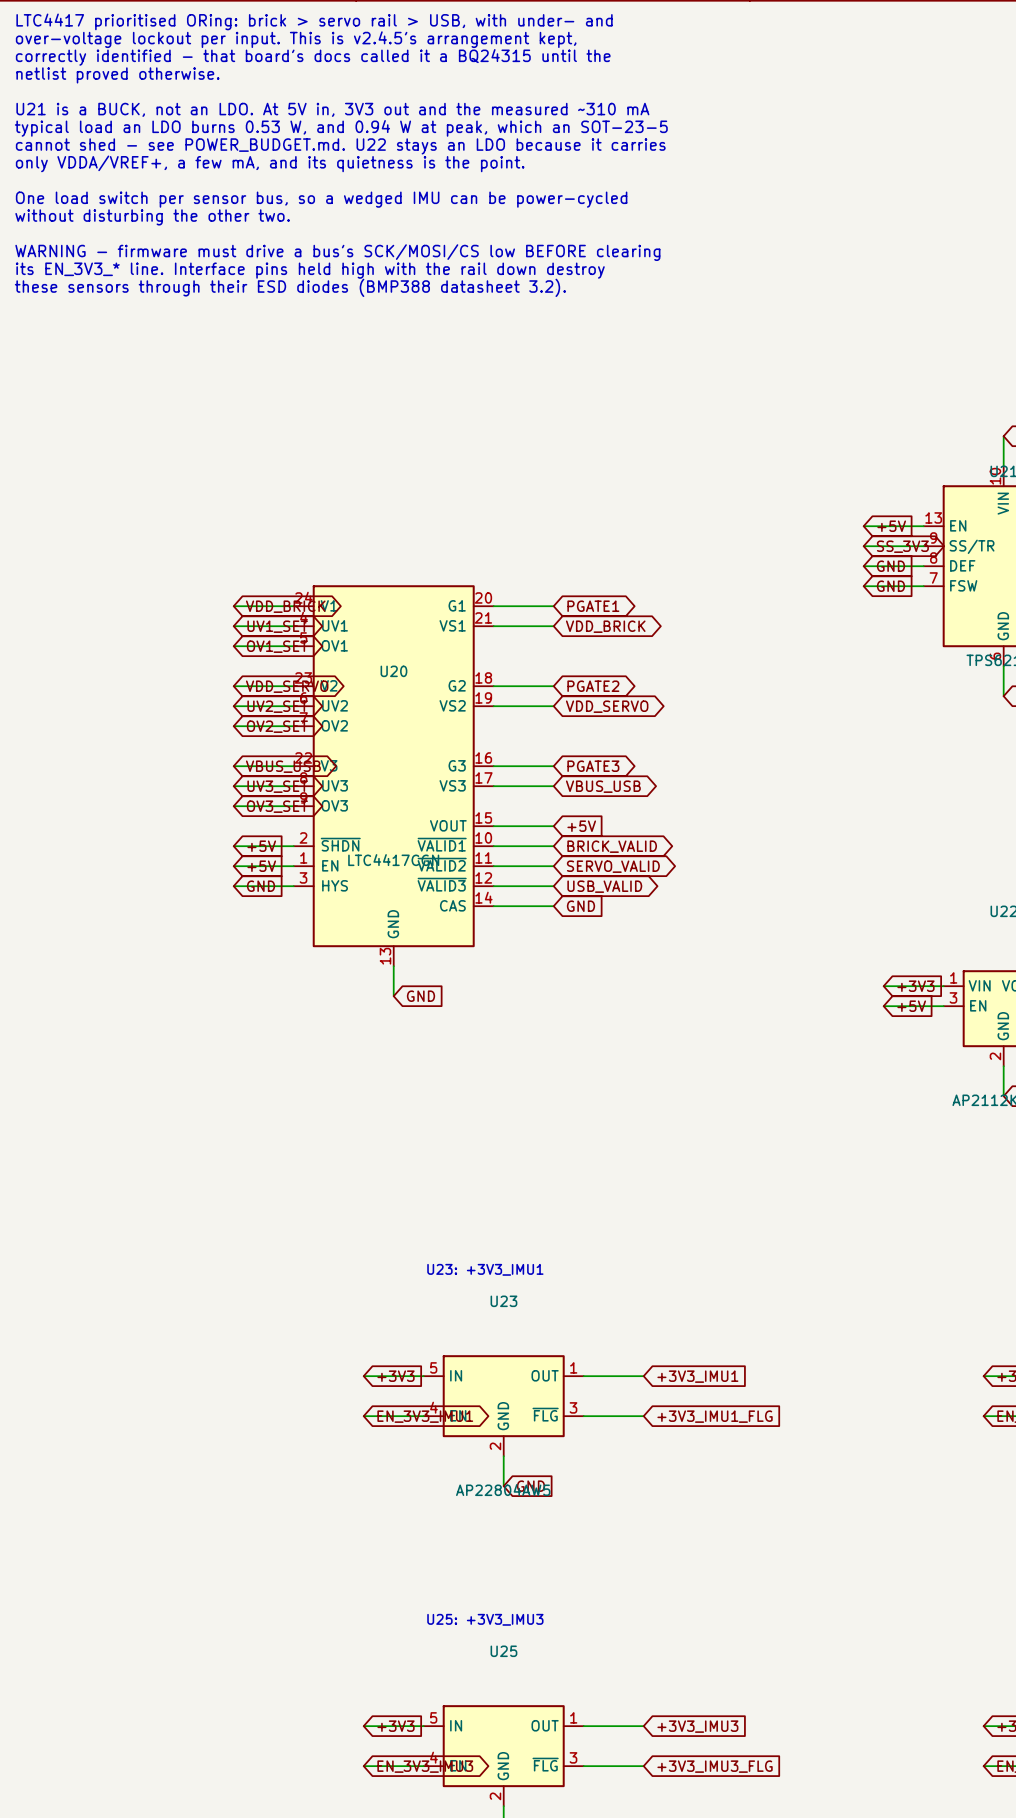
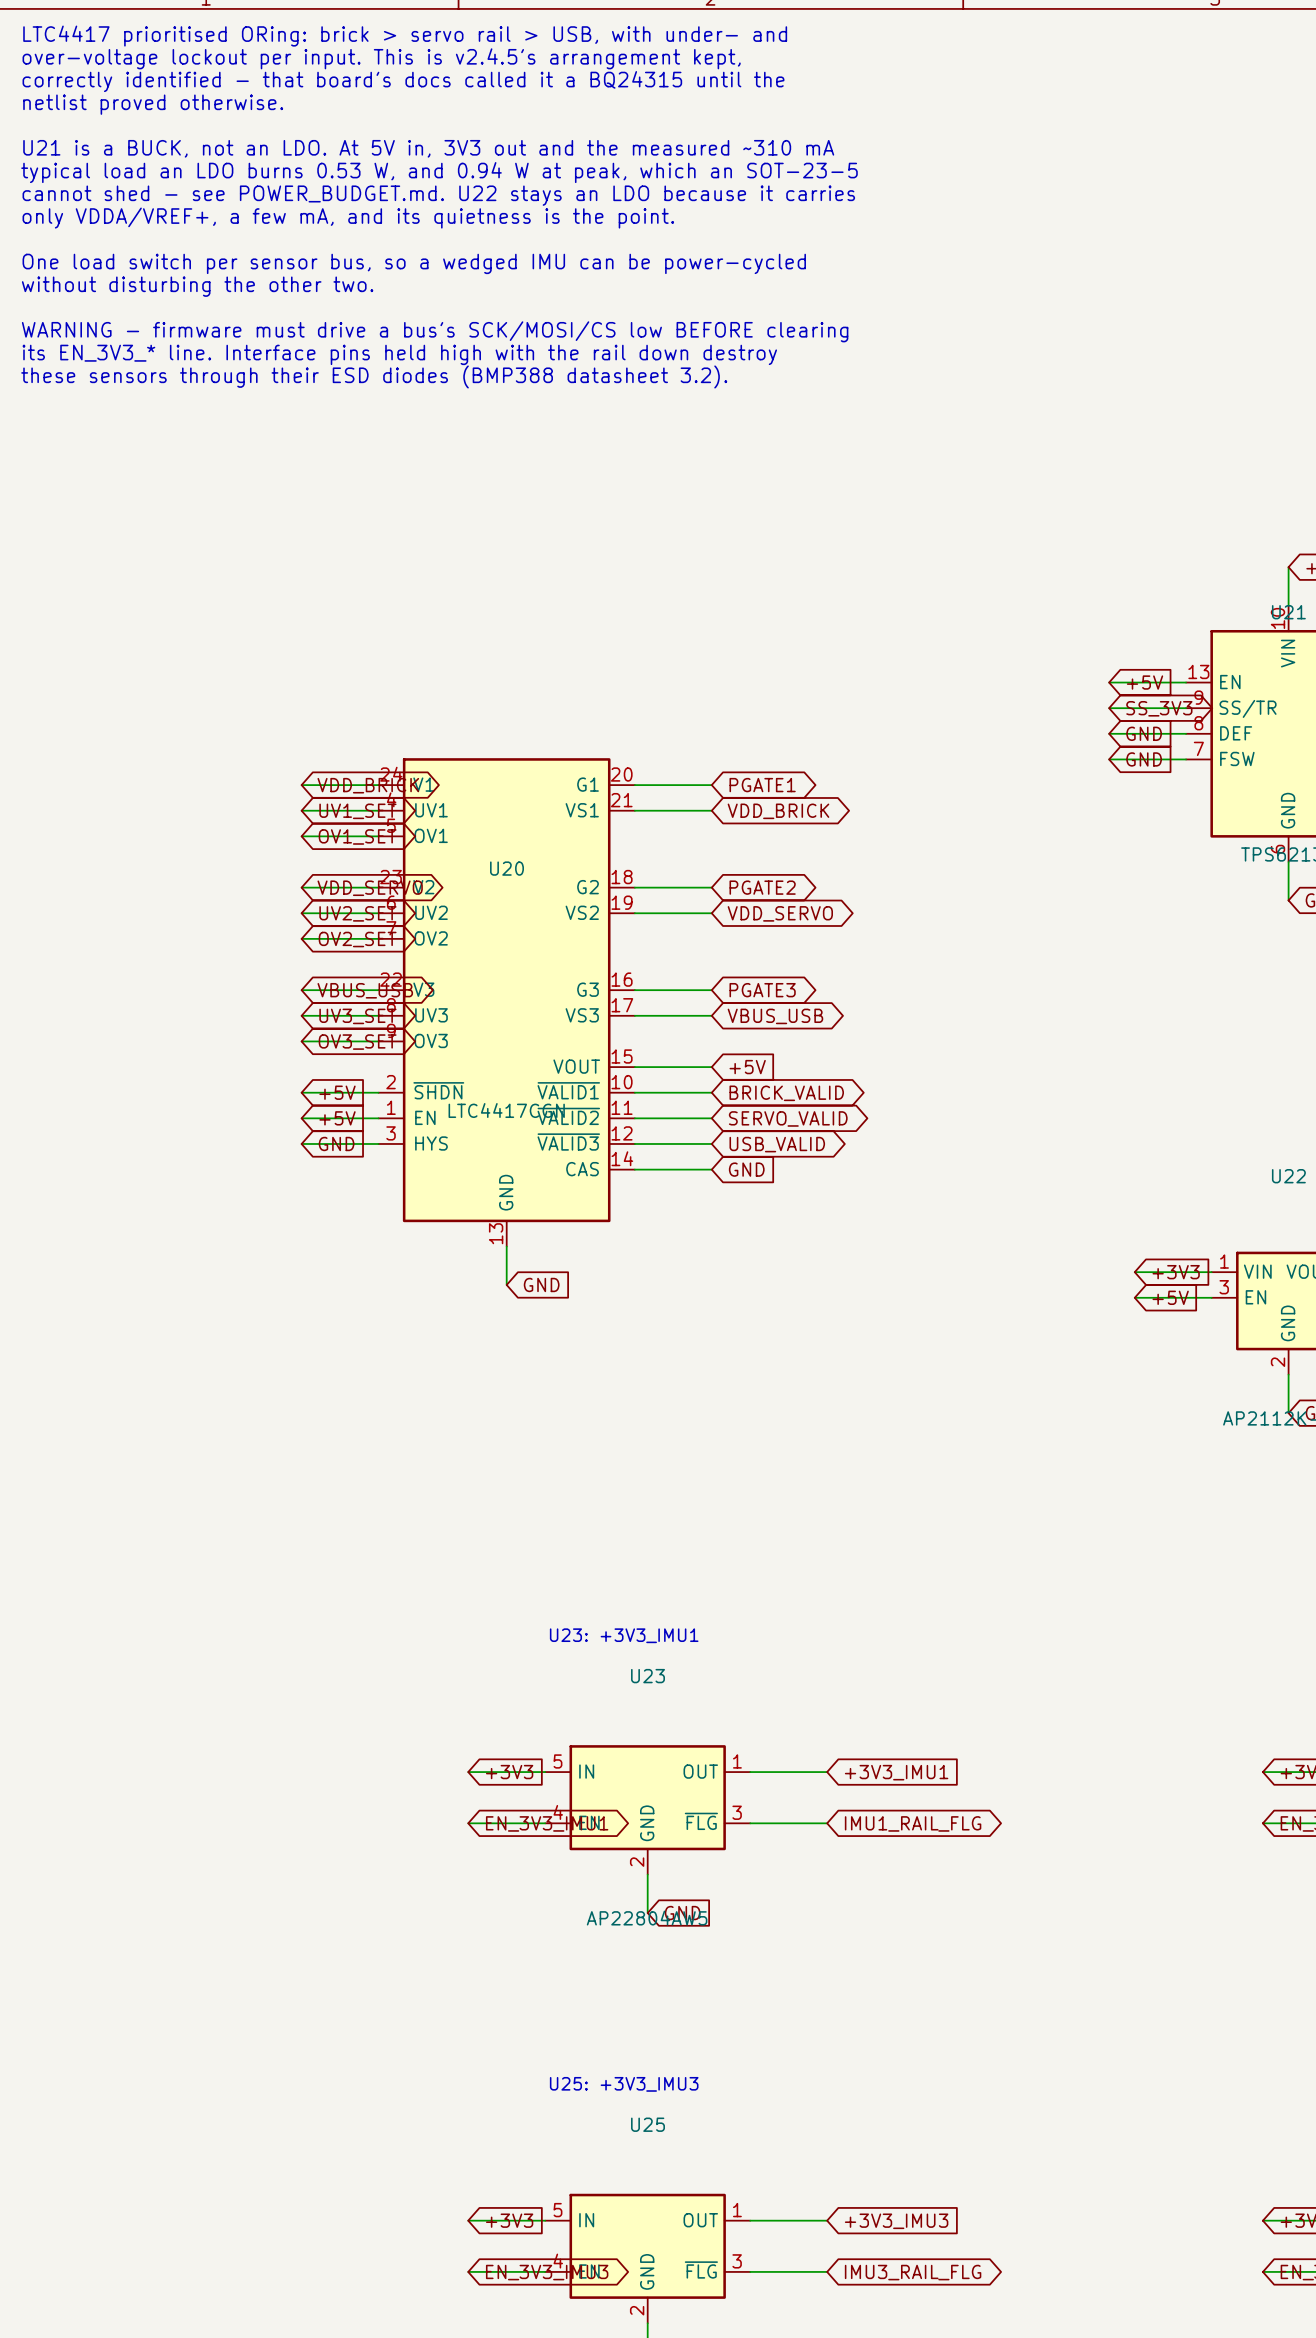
global label shape: input (715, 1416) -> bidirectional (913, 1823)
global label: +3V3_IMU1_FLG (715, 1416) -> IMU1_RAIL_FLG (913, 1823)
global label shape: input (715, 1766) -> bidirectional (913, 2272)
global label: +3V3_IMU3_FLG (715, 1766) -> IMU3_RAIL_FLG (913, 2272)

